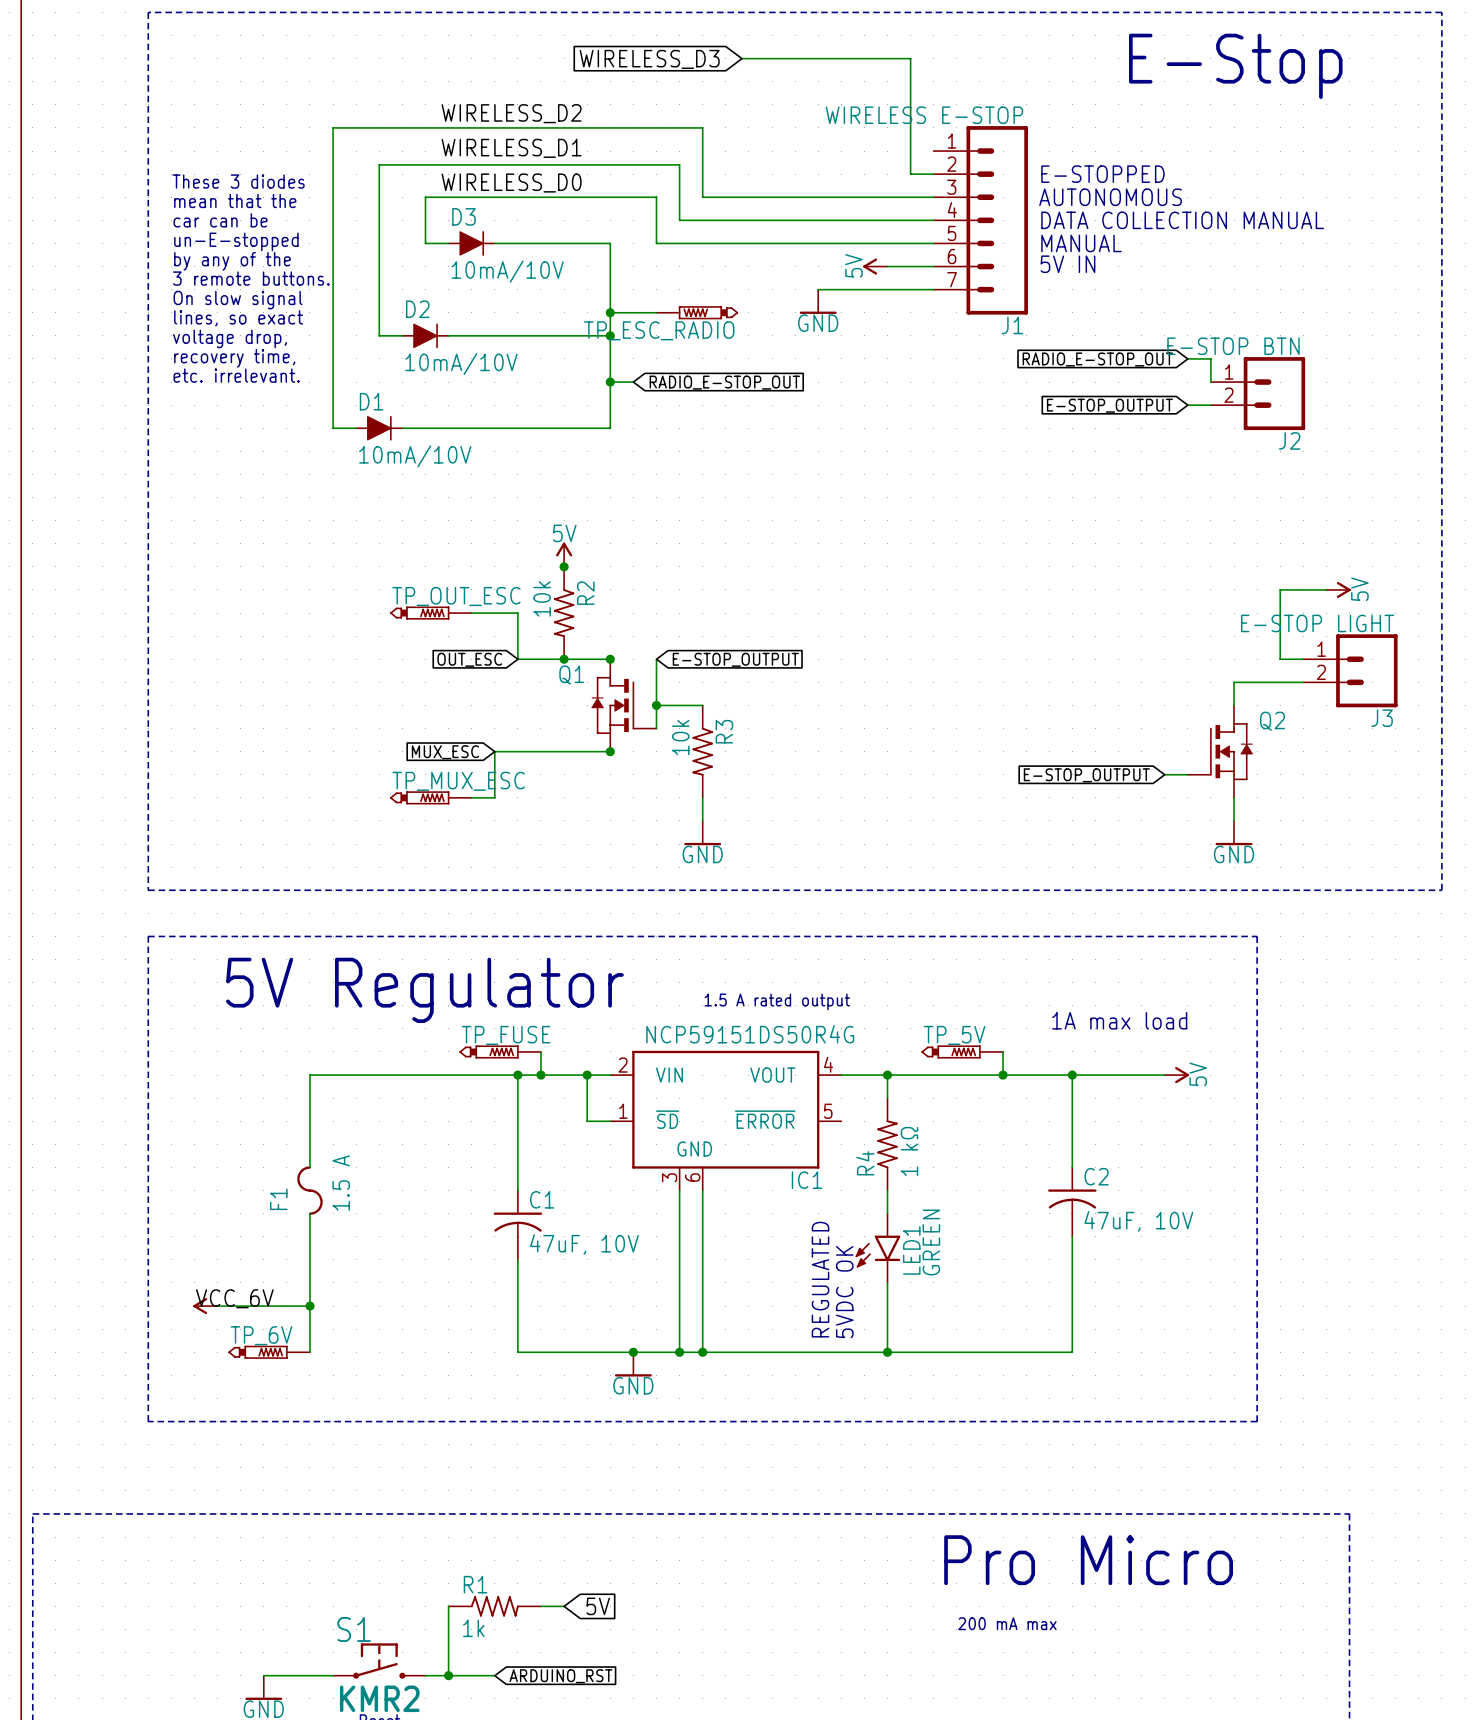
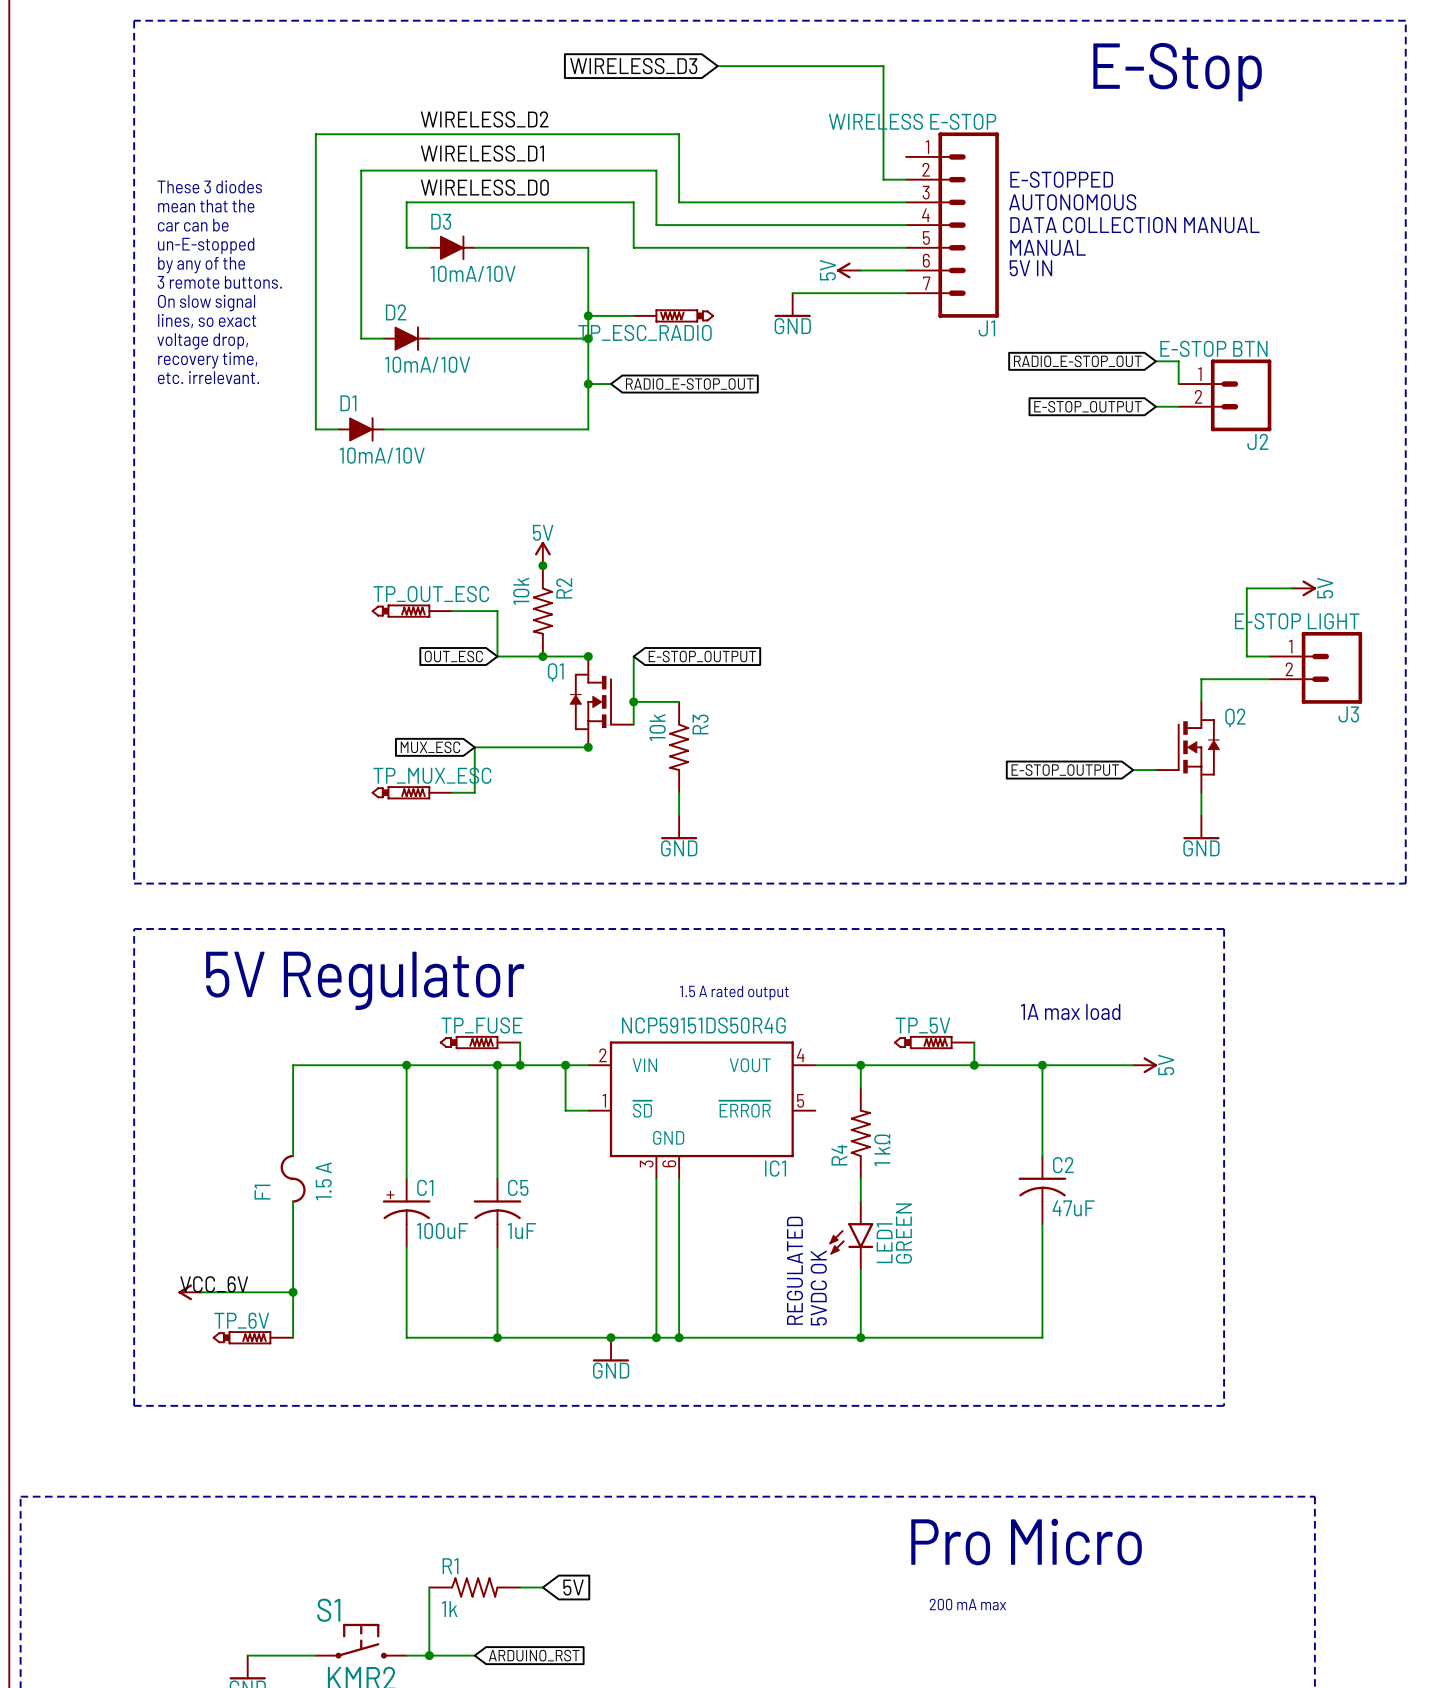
wire: none -> (406, 1065) (406, 1178)
junction: none -> (406, 1065)
C1 name: C1 (542, 1199) -> C5 (518, 1187)
C2 value: 47uF, 10V (1138, 1221) -> 47uF (1073, 1208)
C1: none -> 100uF (406, 1212)
C1 value: 47uF, 10V (584, 1244) -> 1uF (521, 1231)
wire: none -> (406, 1246) (406, 1337) (497, 1337)
junction: none -> (497, 1337)

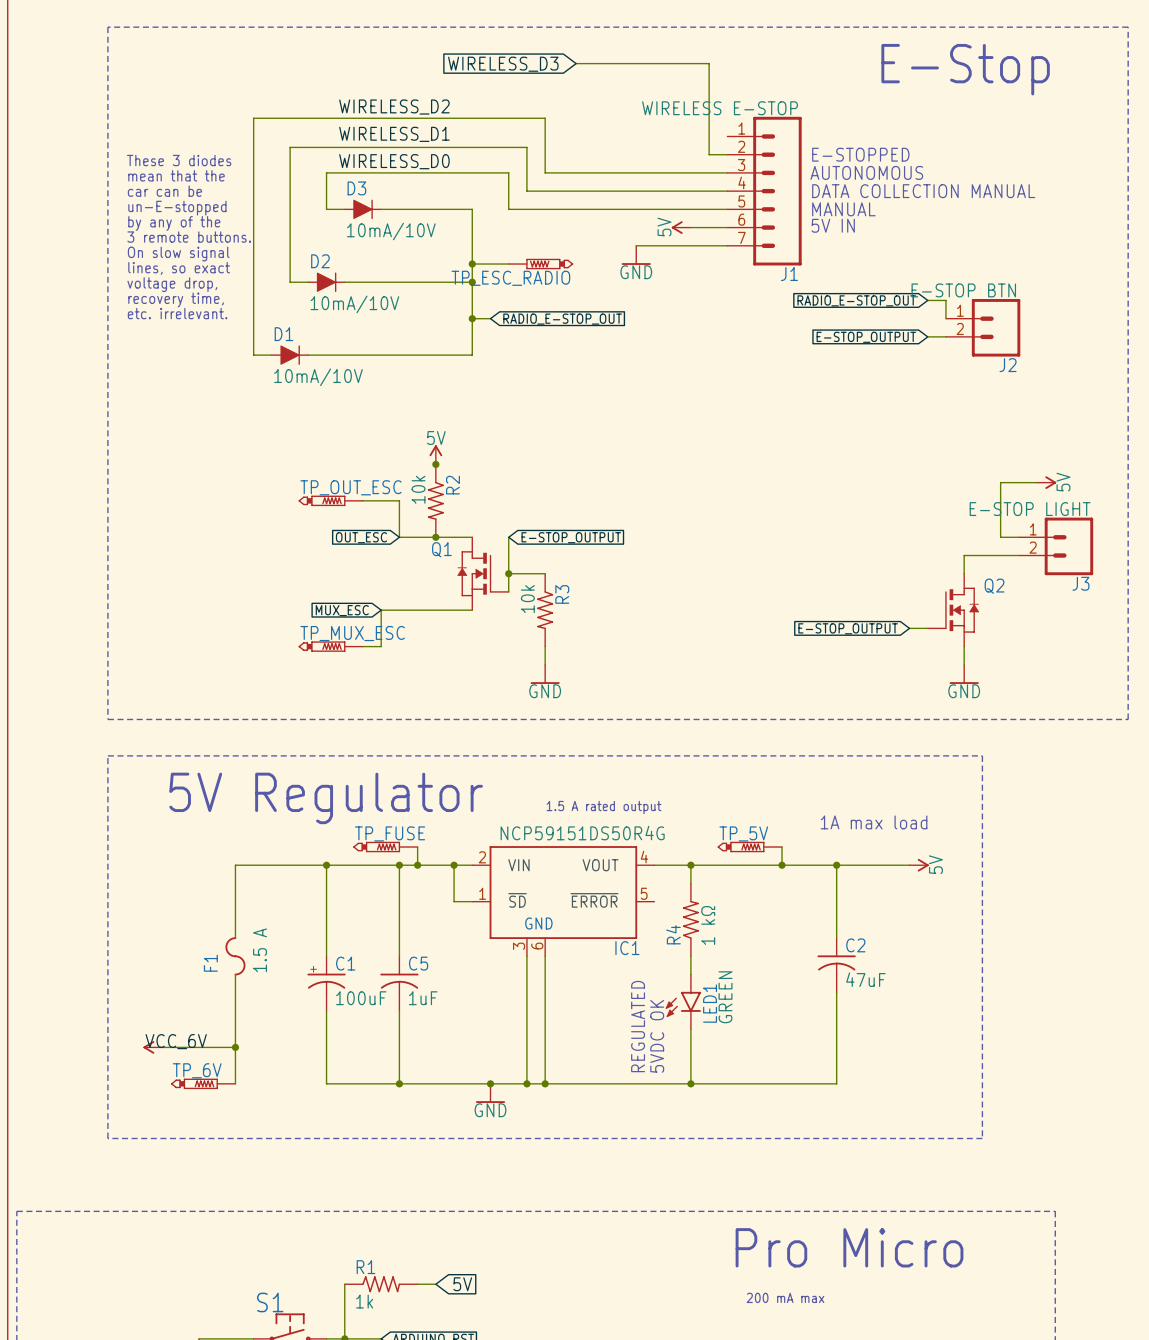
junction: (588, 656) -> none
junction: (588, 747) -> none

